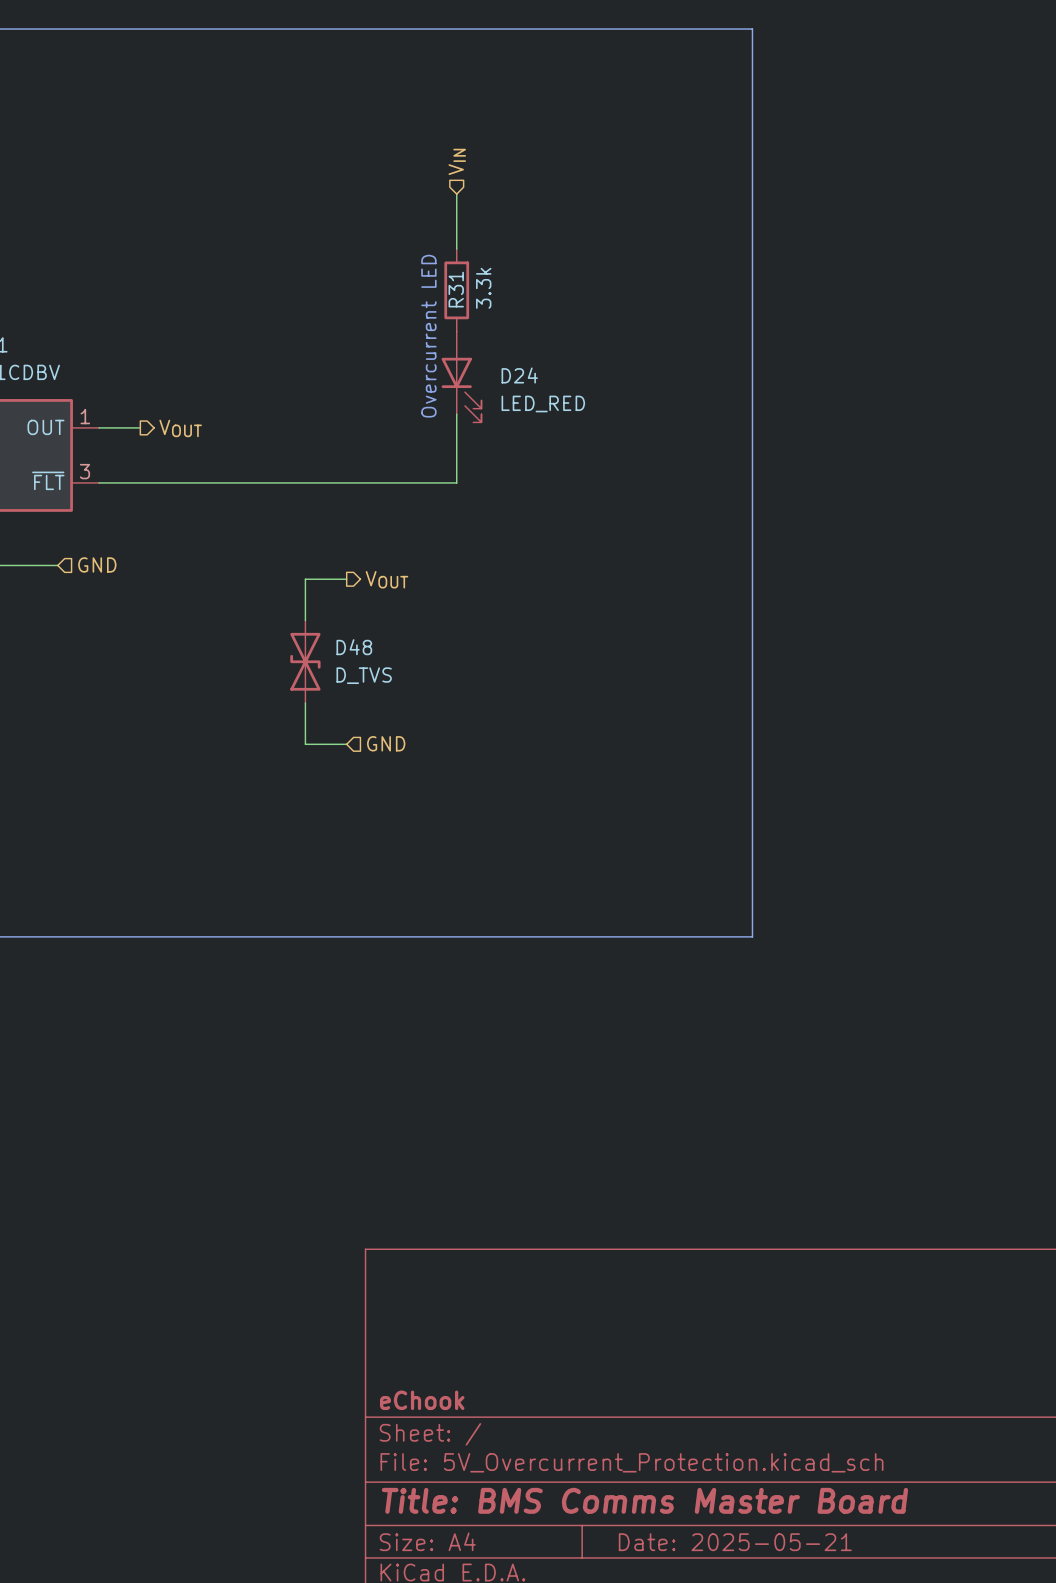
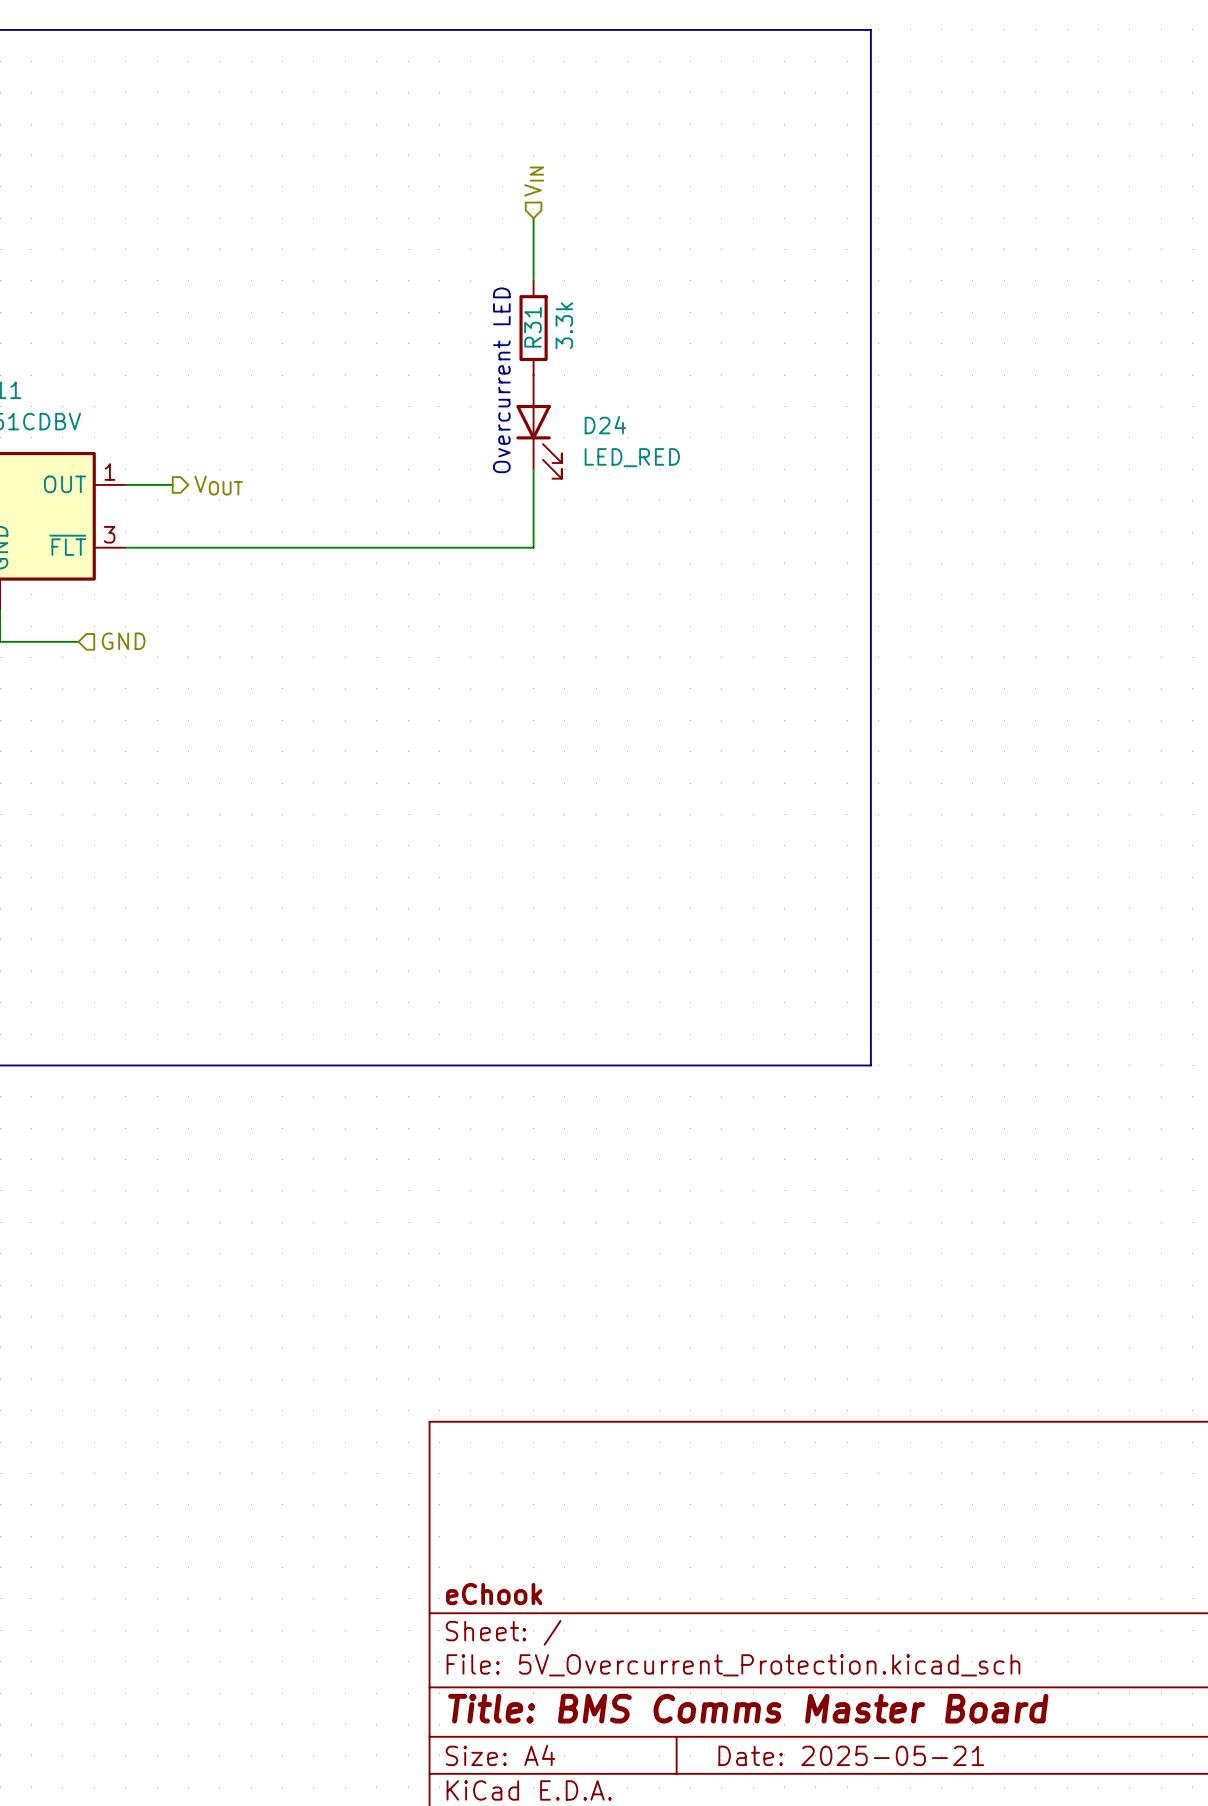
wire: (346, 579) (305, 579) (305, 620) -> none
hierarchical label: VOUT (386, 579) -> none
D48: D_TVS (305, 661) -> none
wire: (305, 703) (305, 744) (346, 744) -> none
hierarchical label: GND (386, 743) -> none

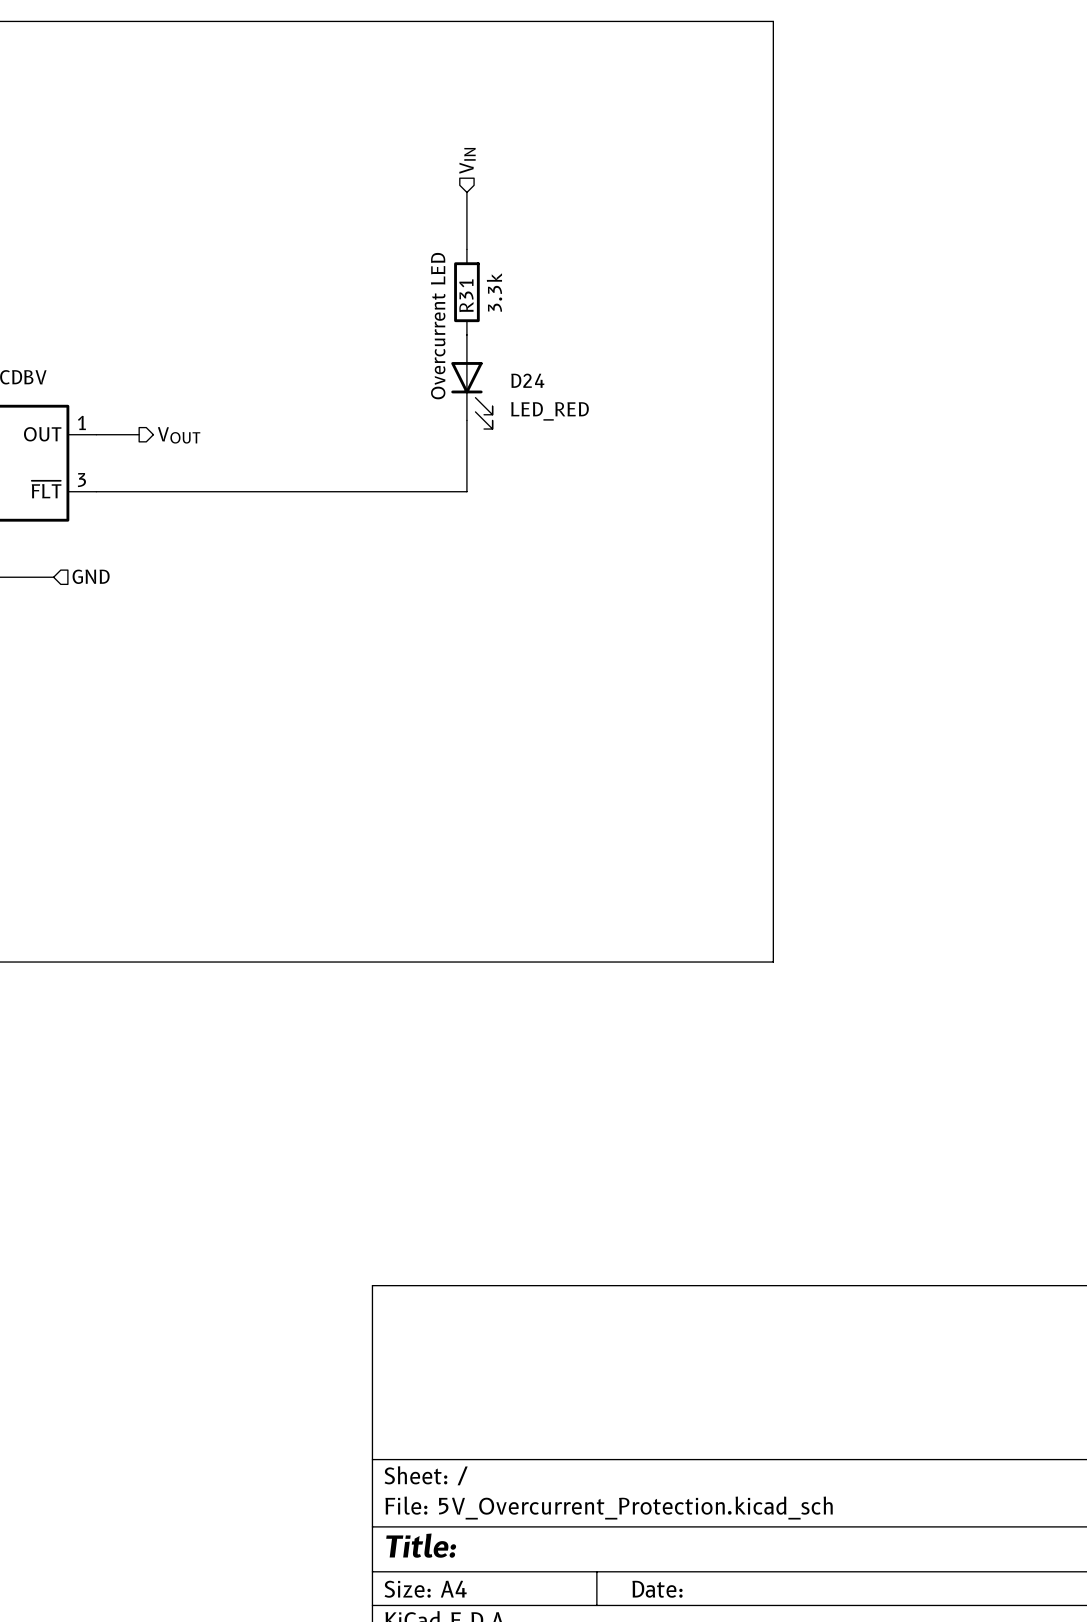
title block: eChook (494, 1594) -> none
title block: Title: BMS Comms Master Board (748, 1708) -> Title: (421, 1545)
title block: Date: 2025-05-21 (851, 1755) -> Date: (657, 1589)

